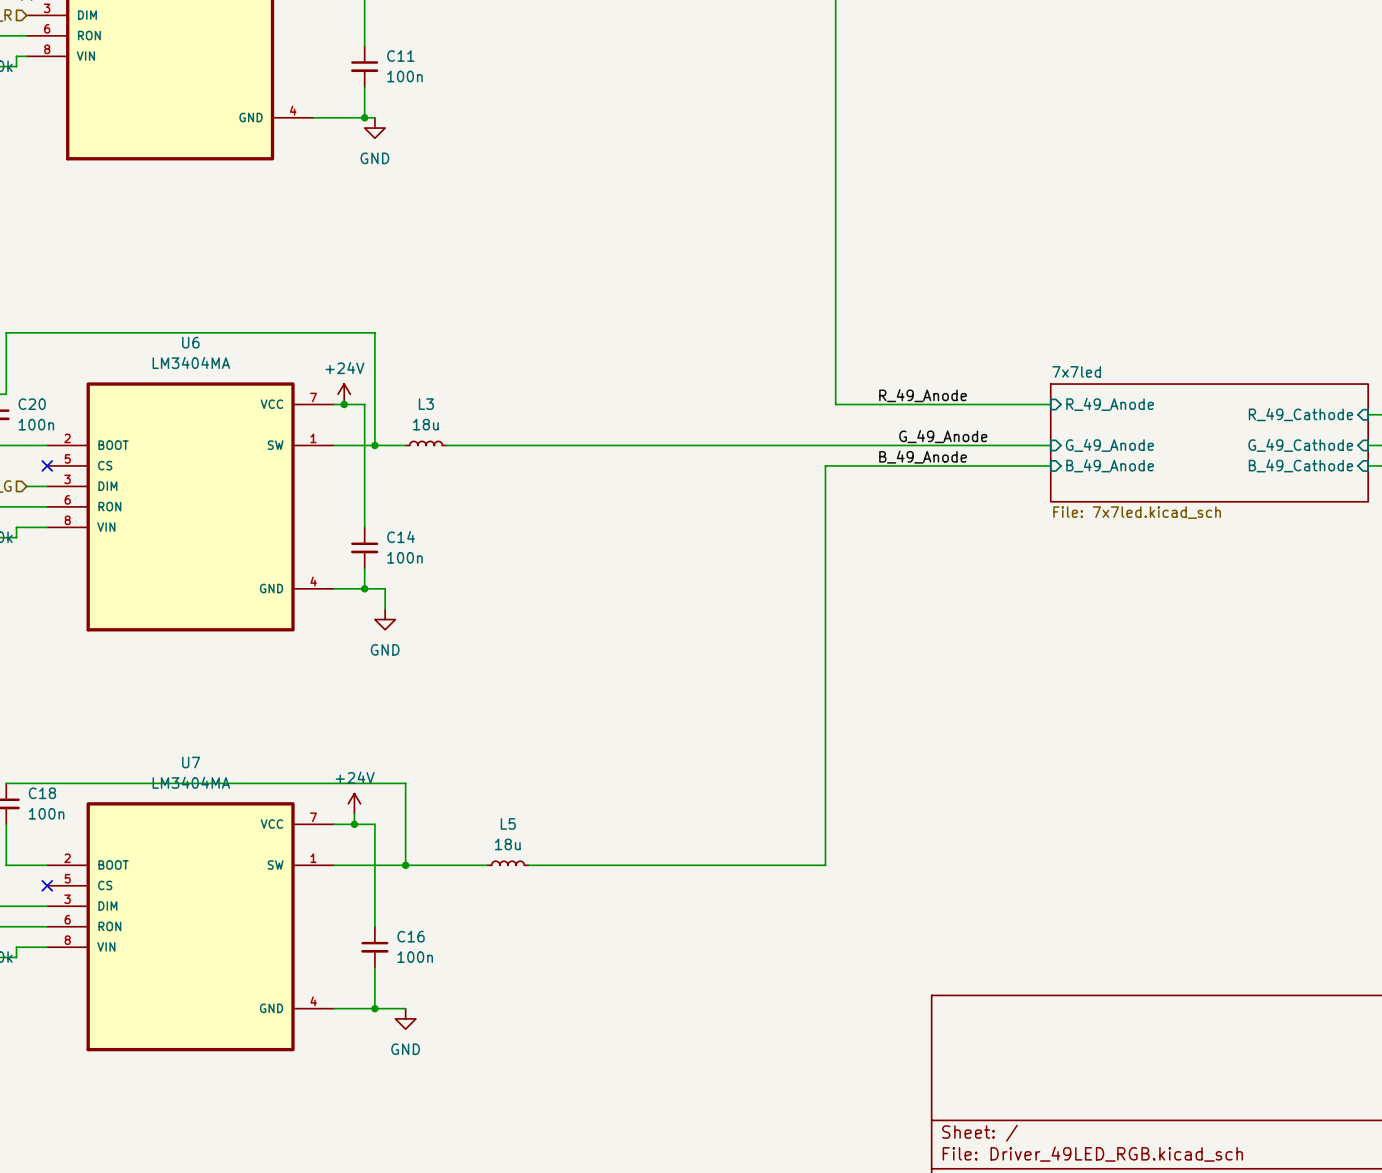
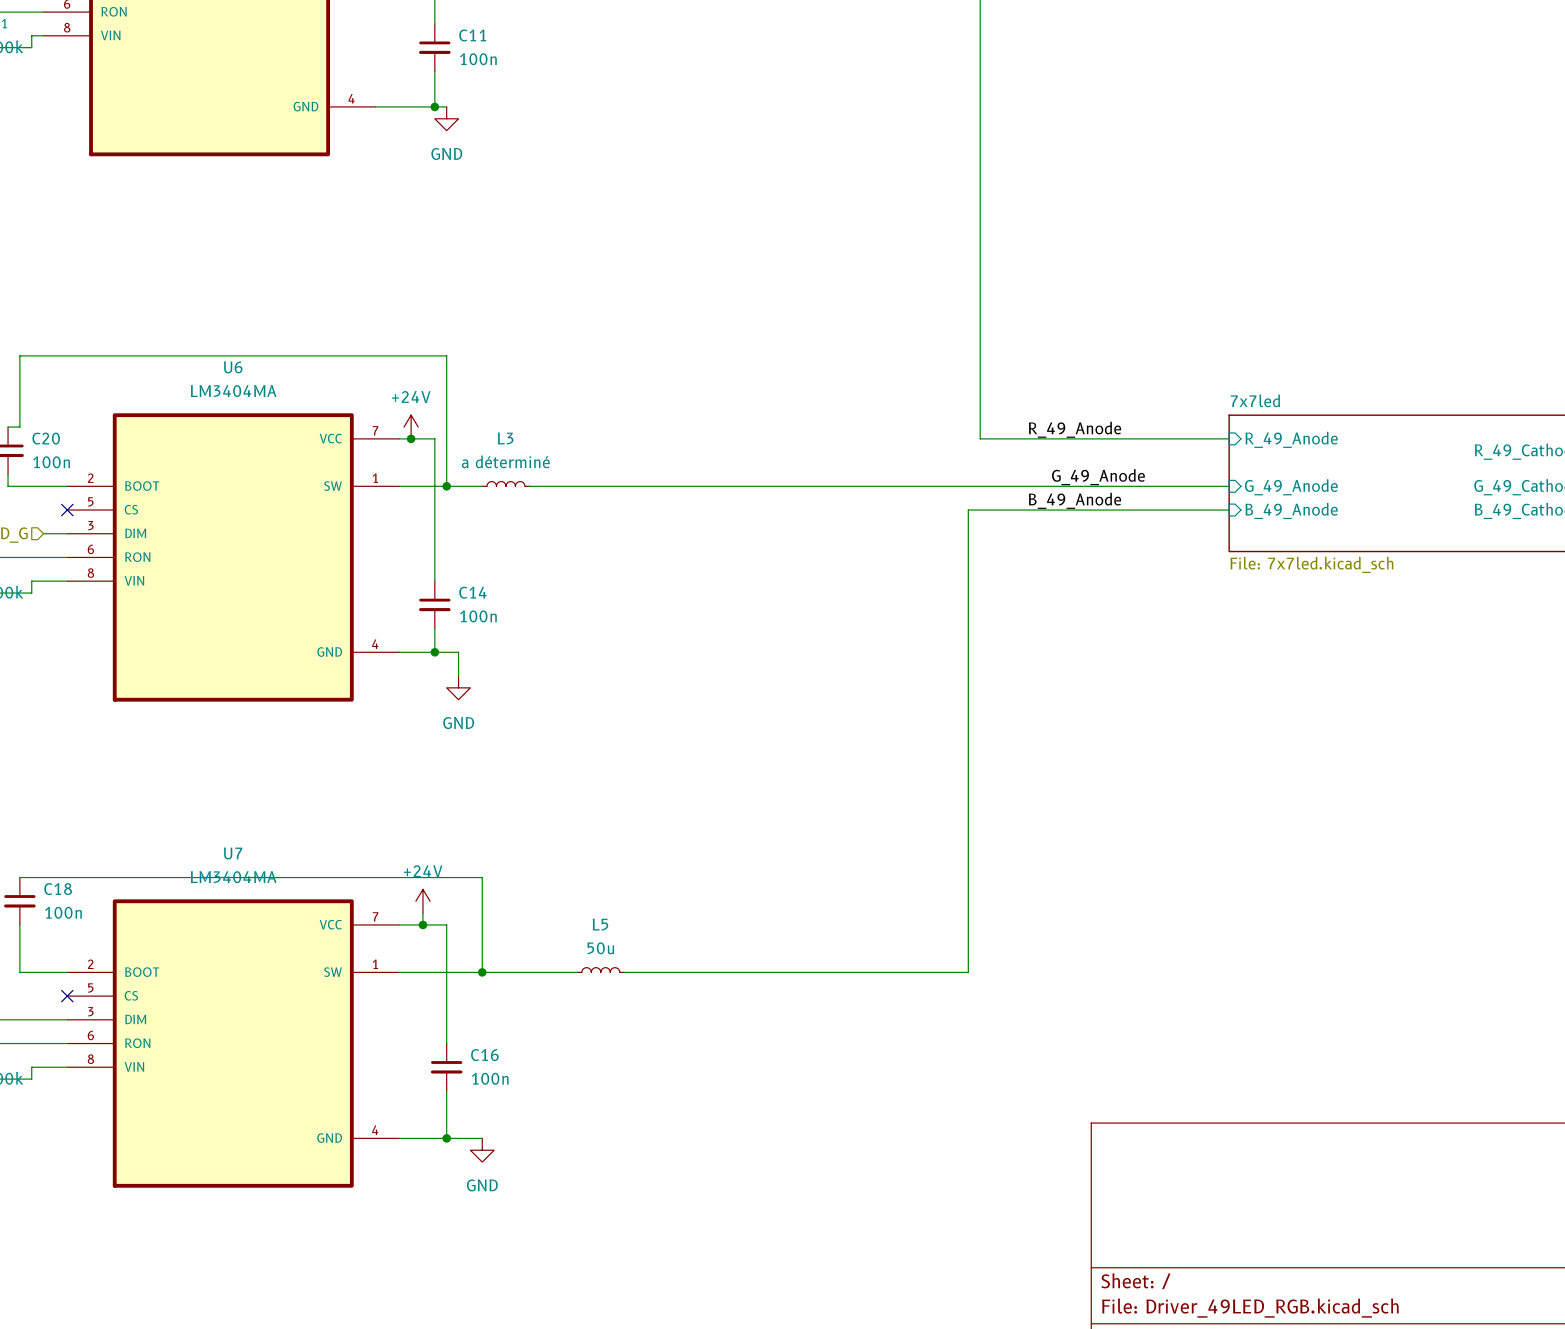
L3 value: 18u (425, 424) -> a déterminé (505, 461)
L5 value: 18u (507, 844) -> 50u (600, 948)

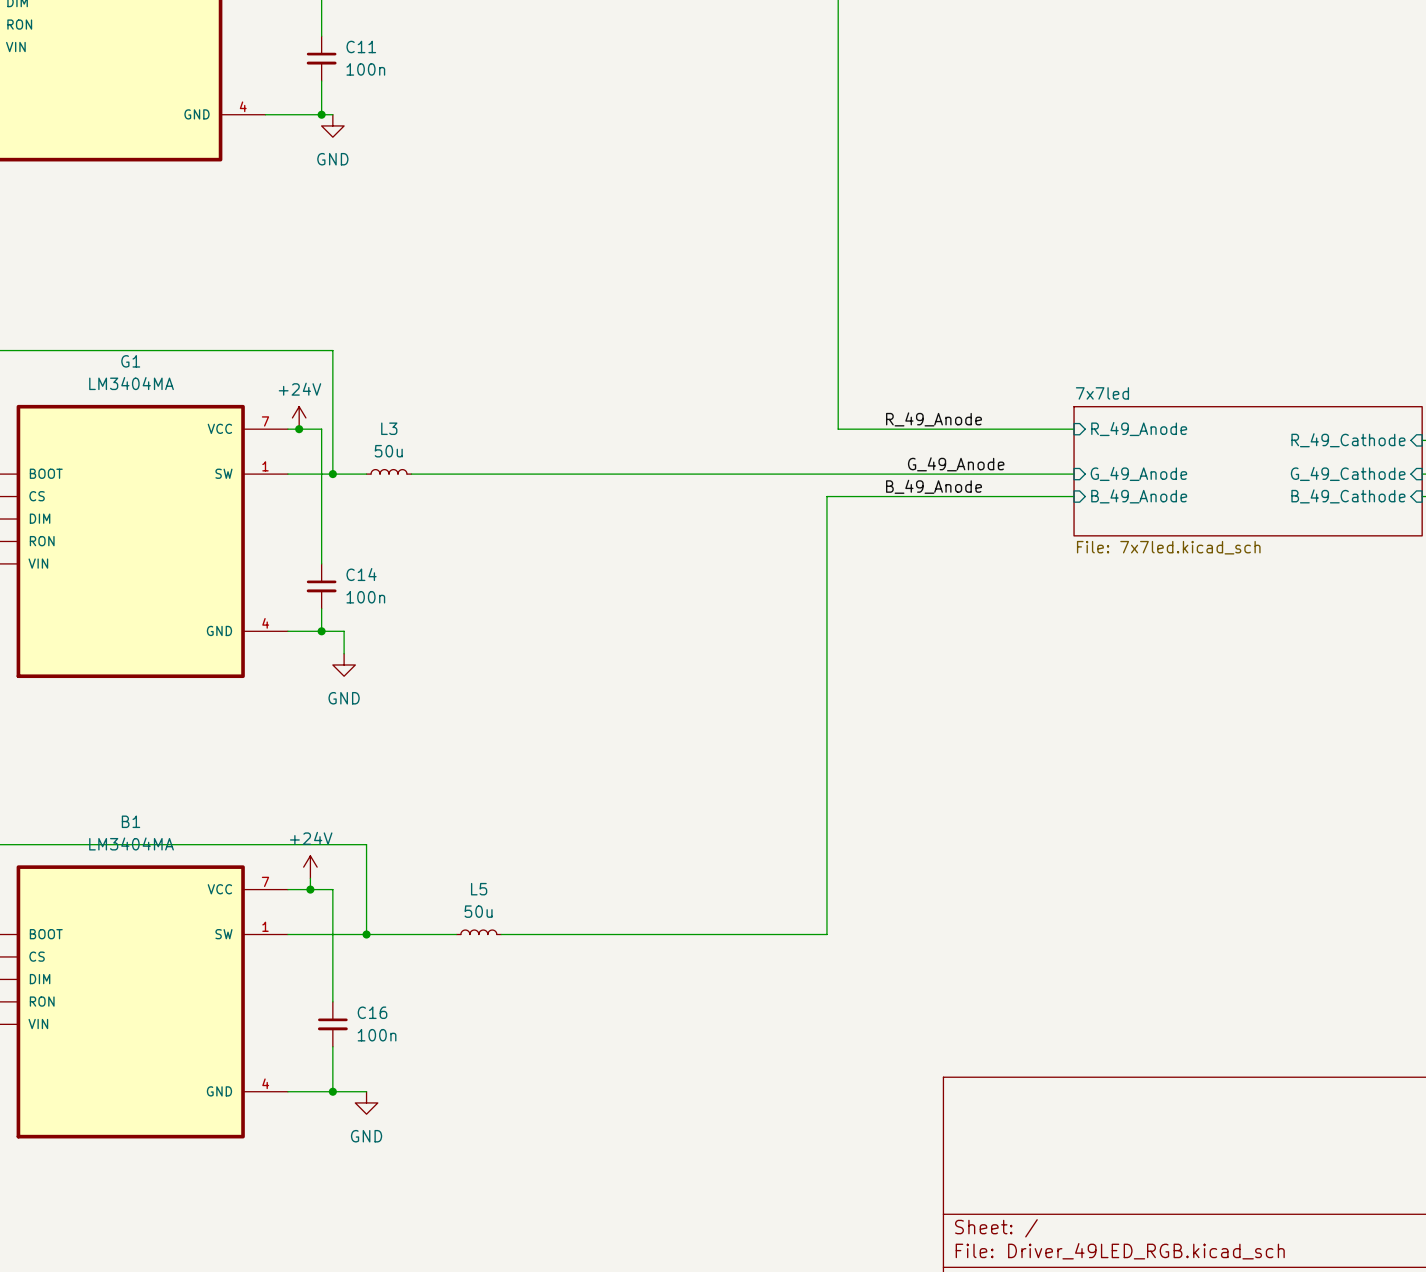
U6 name: U6 (233, 367) -> G1 (130, 361)
L3 value: a déterminé (505, 461) -> 50u (388, 451)
U7 name: U7 (233, 853) -> B1 (130, 821)

